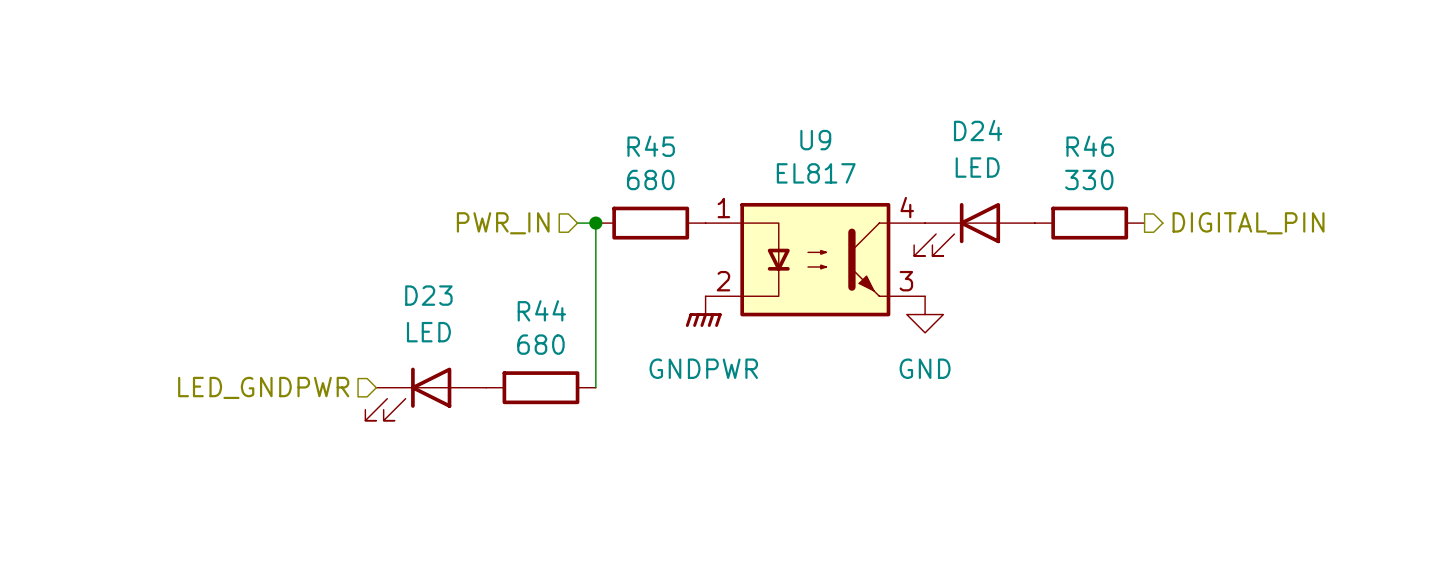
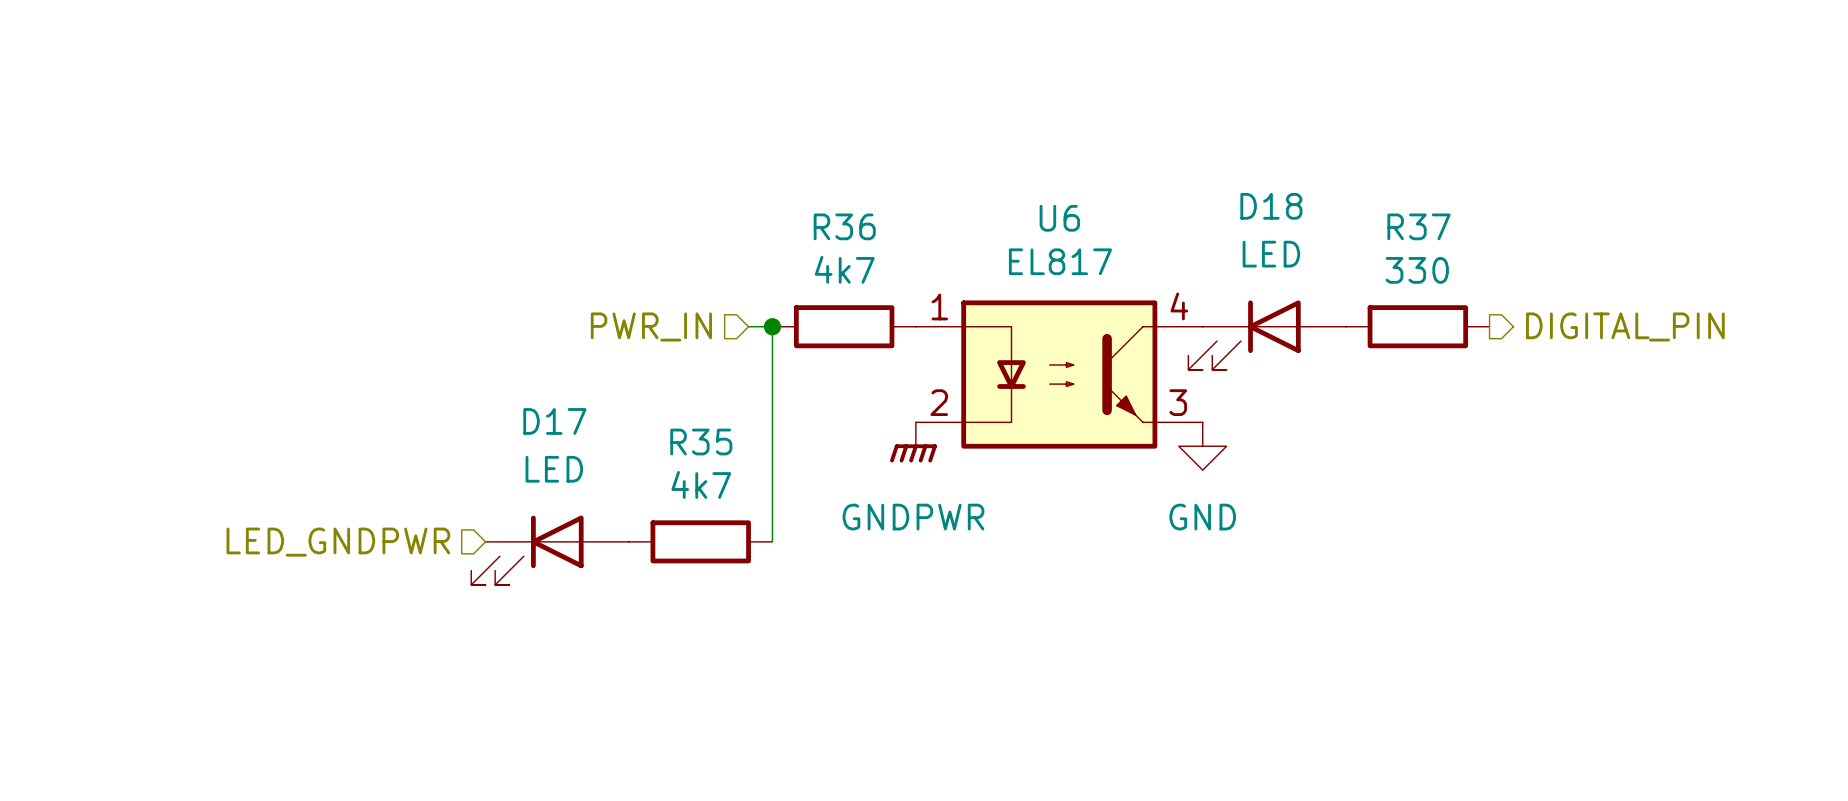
D24 name: D24 (978, 130) -> D18 (1271, 206)
U9 name: U9 (815, 140) -> U6 (1059, 218)
R45 name: R45 (651, 146) -> R36 (844, 226)
R46 name: R46 (1090, 146) -> R37 (1418, 226)
R45 value: 680 (650, 179) -> 4k7 (844, 269)
D23 name: D23 (428, 295) -> D17 (554, 421)
R44 name: R44 (541, 310) -> R35 (701, 442)
R44 value: 680 (540, 344) -> 4k7 (701, 484)

